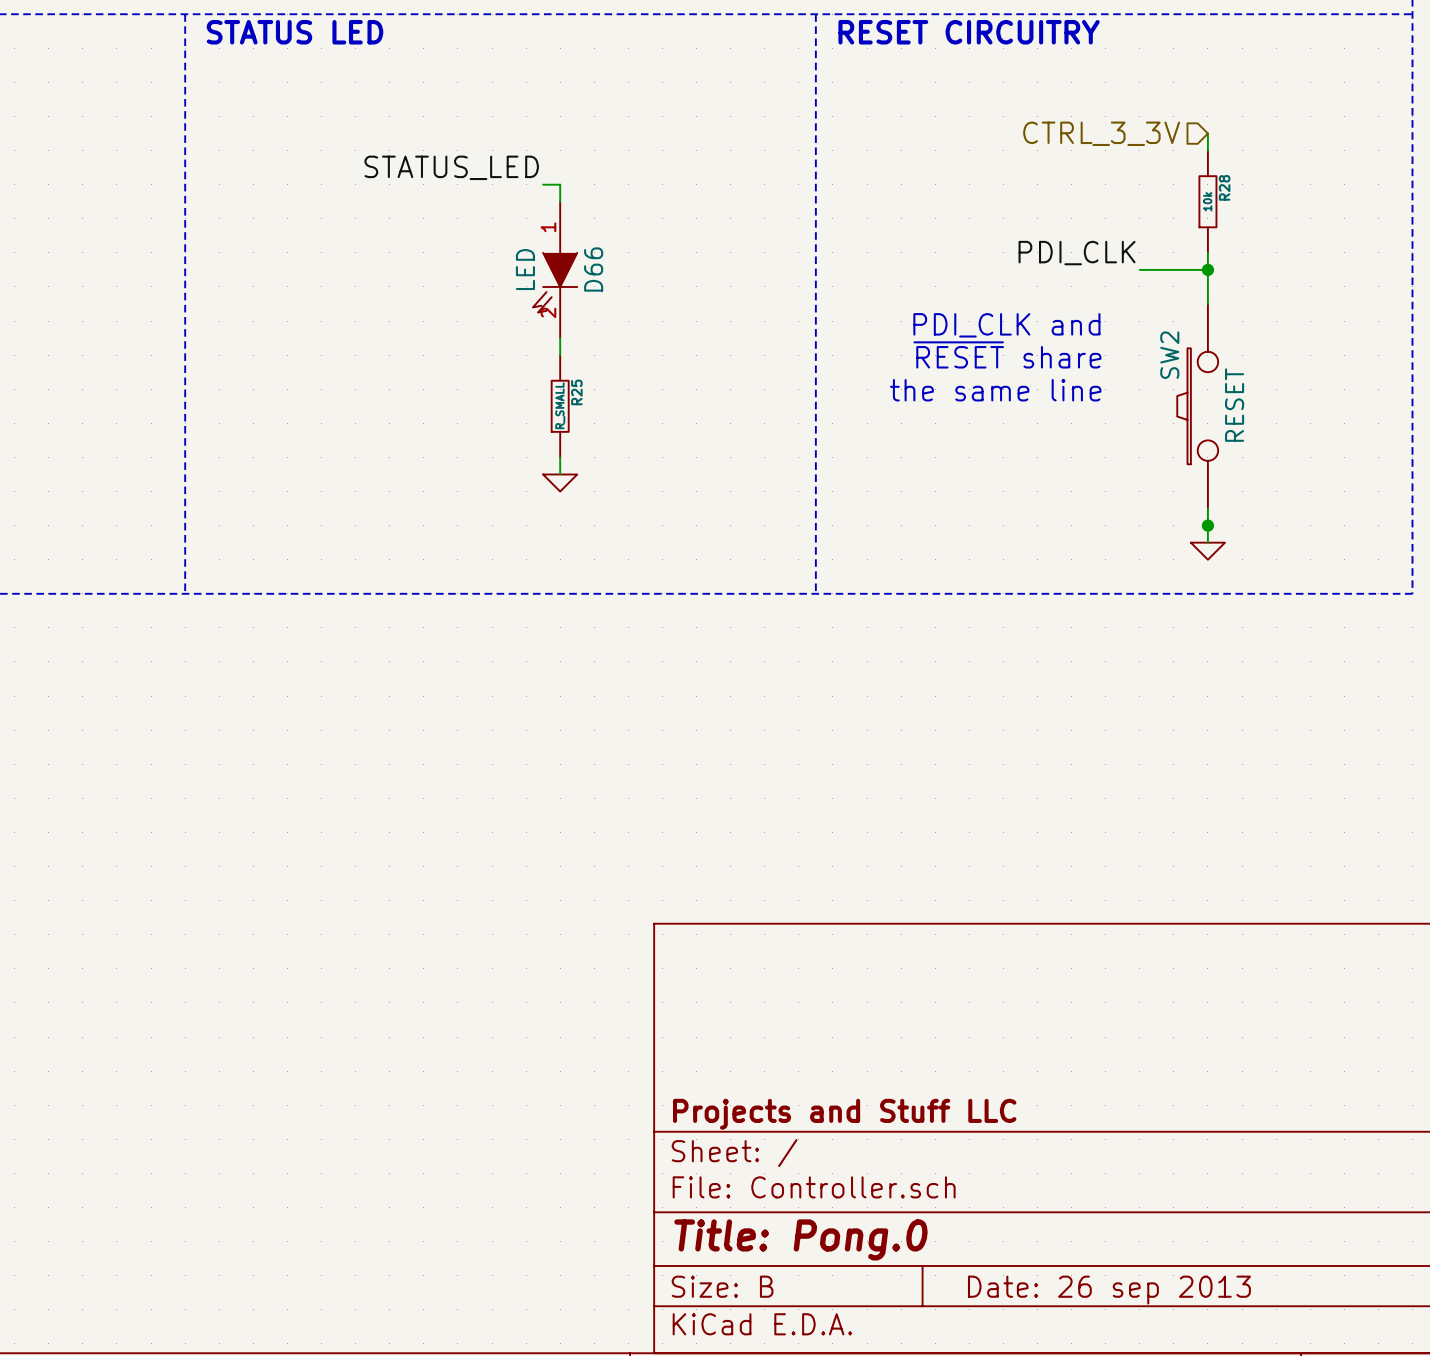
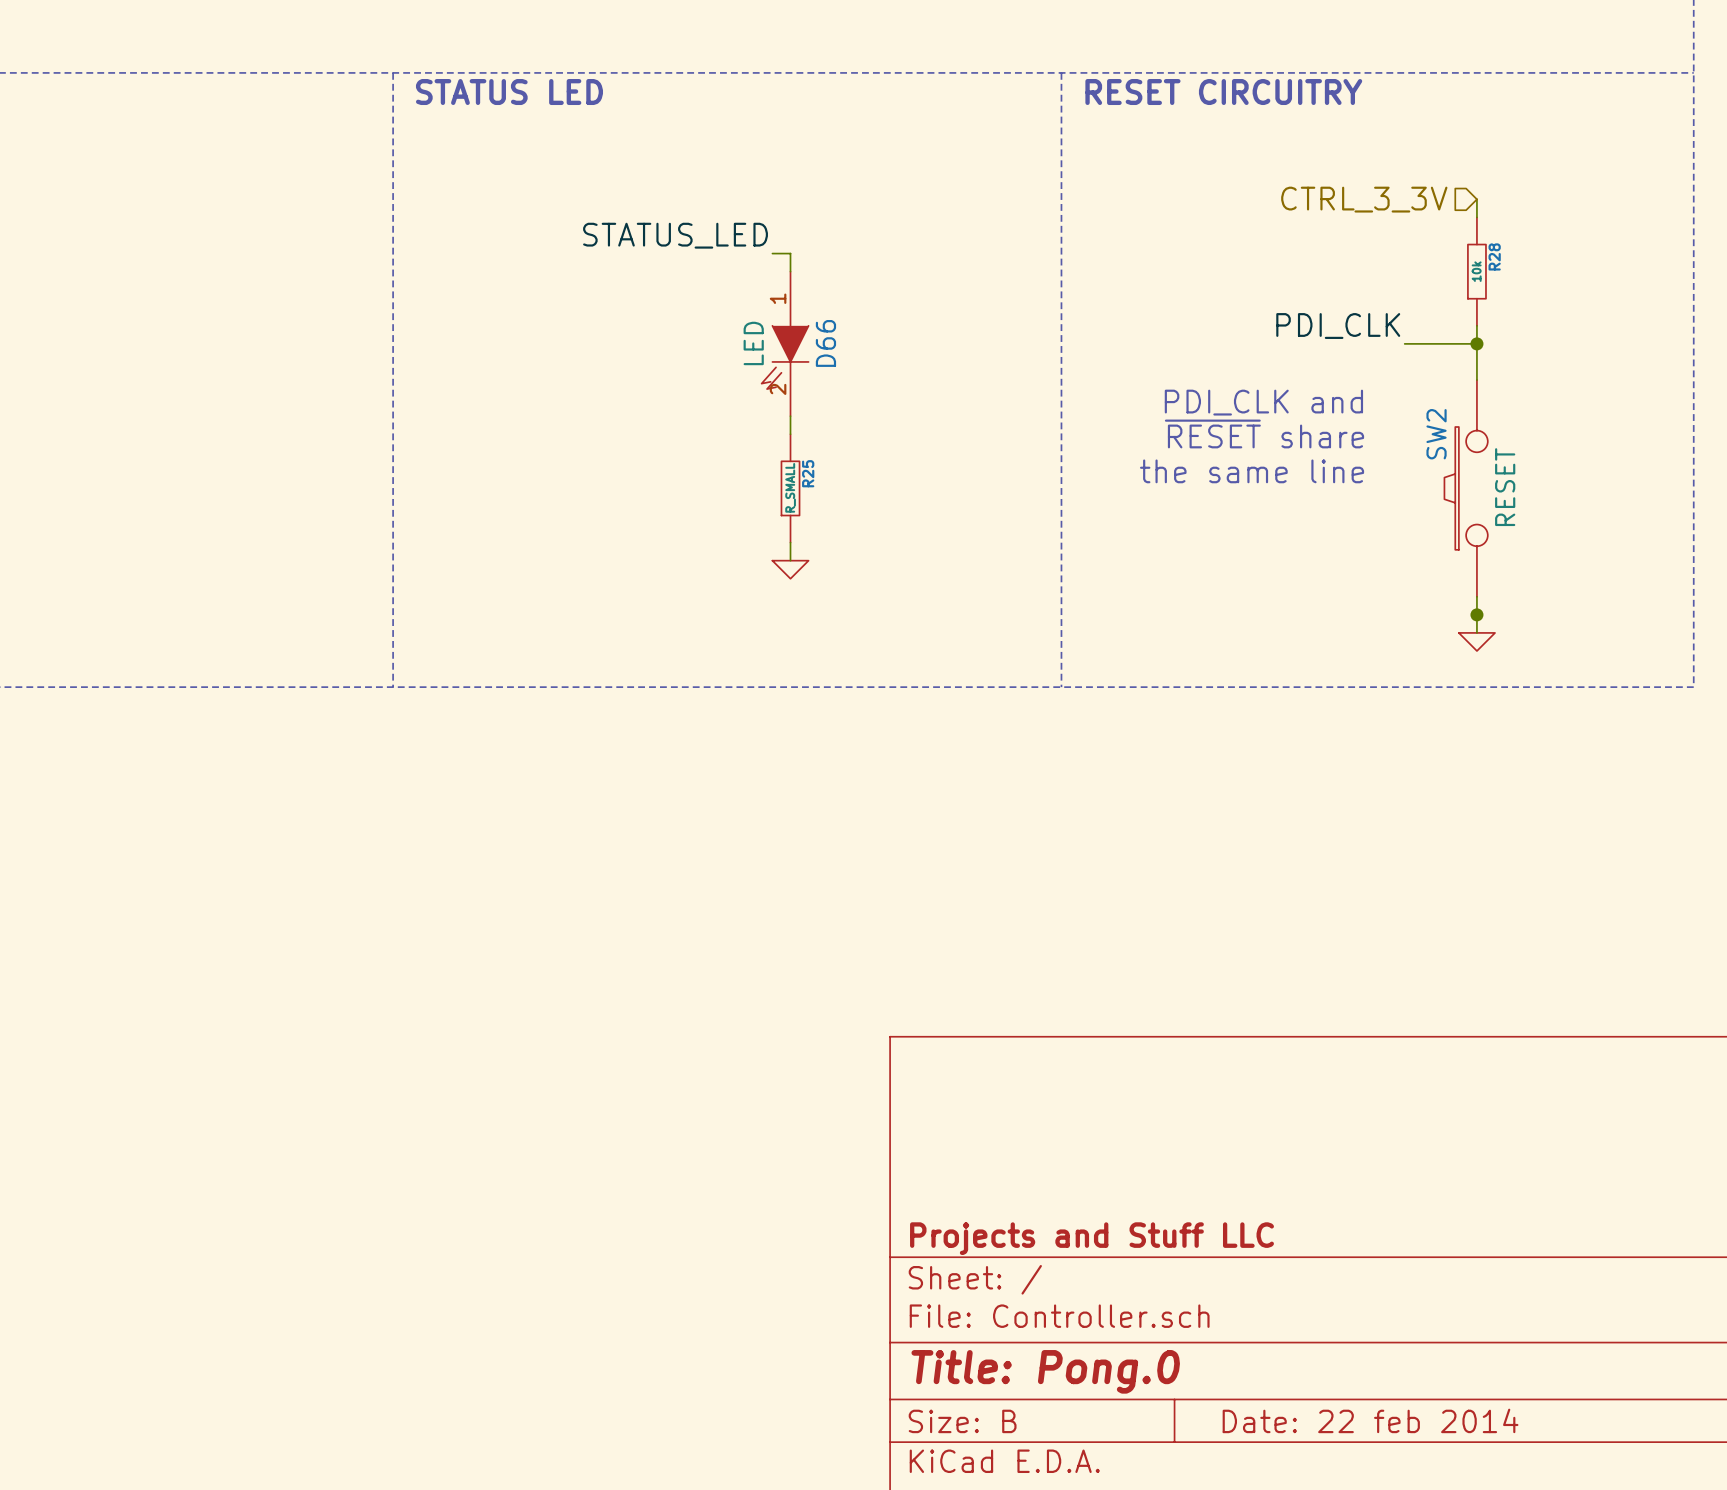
title block: Date: 26 sep 2013 (1109, 1290) -> Date: 22 feb 2014 (1370, 1420)

